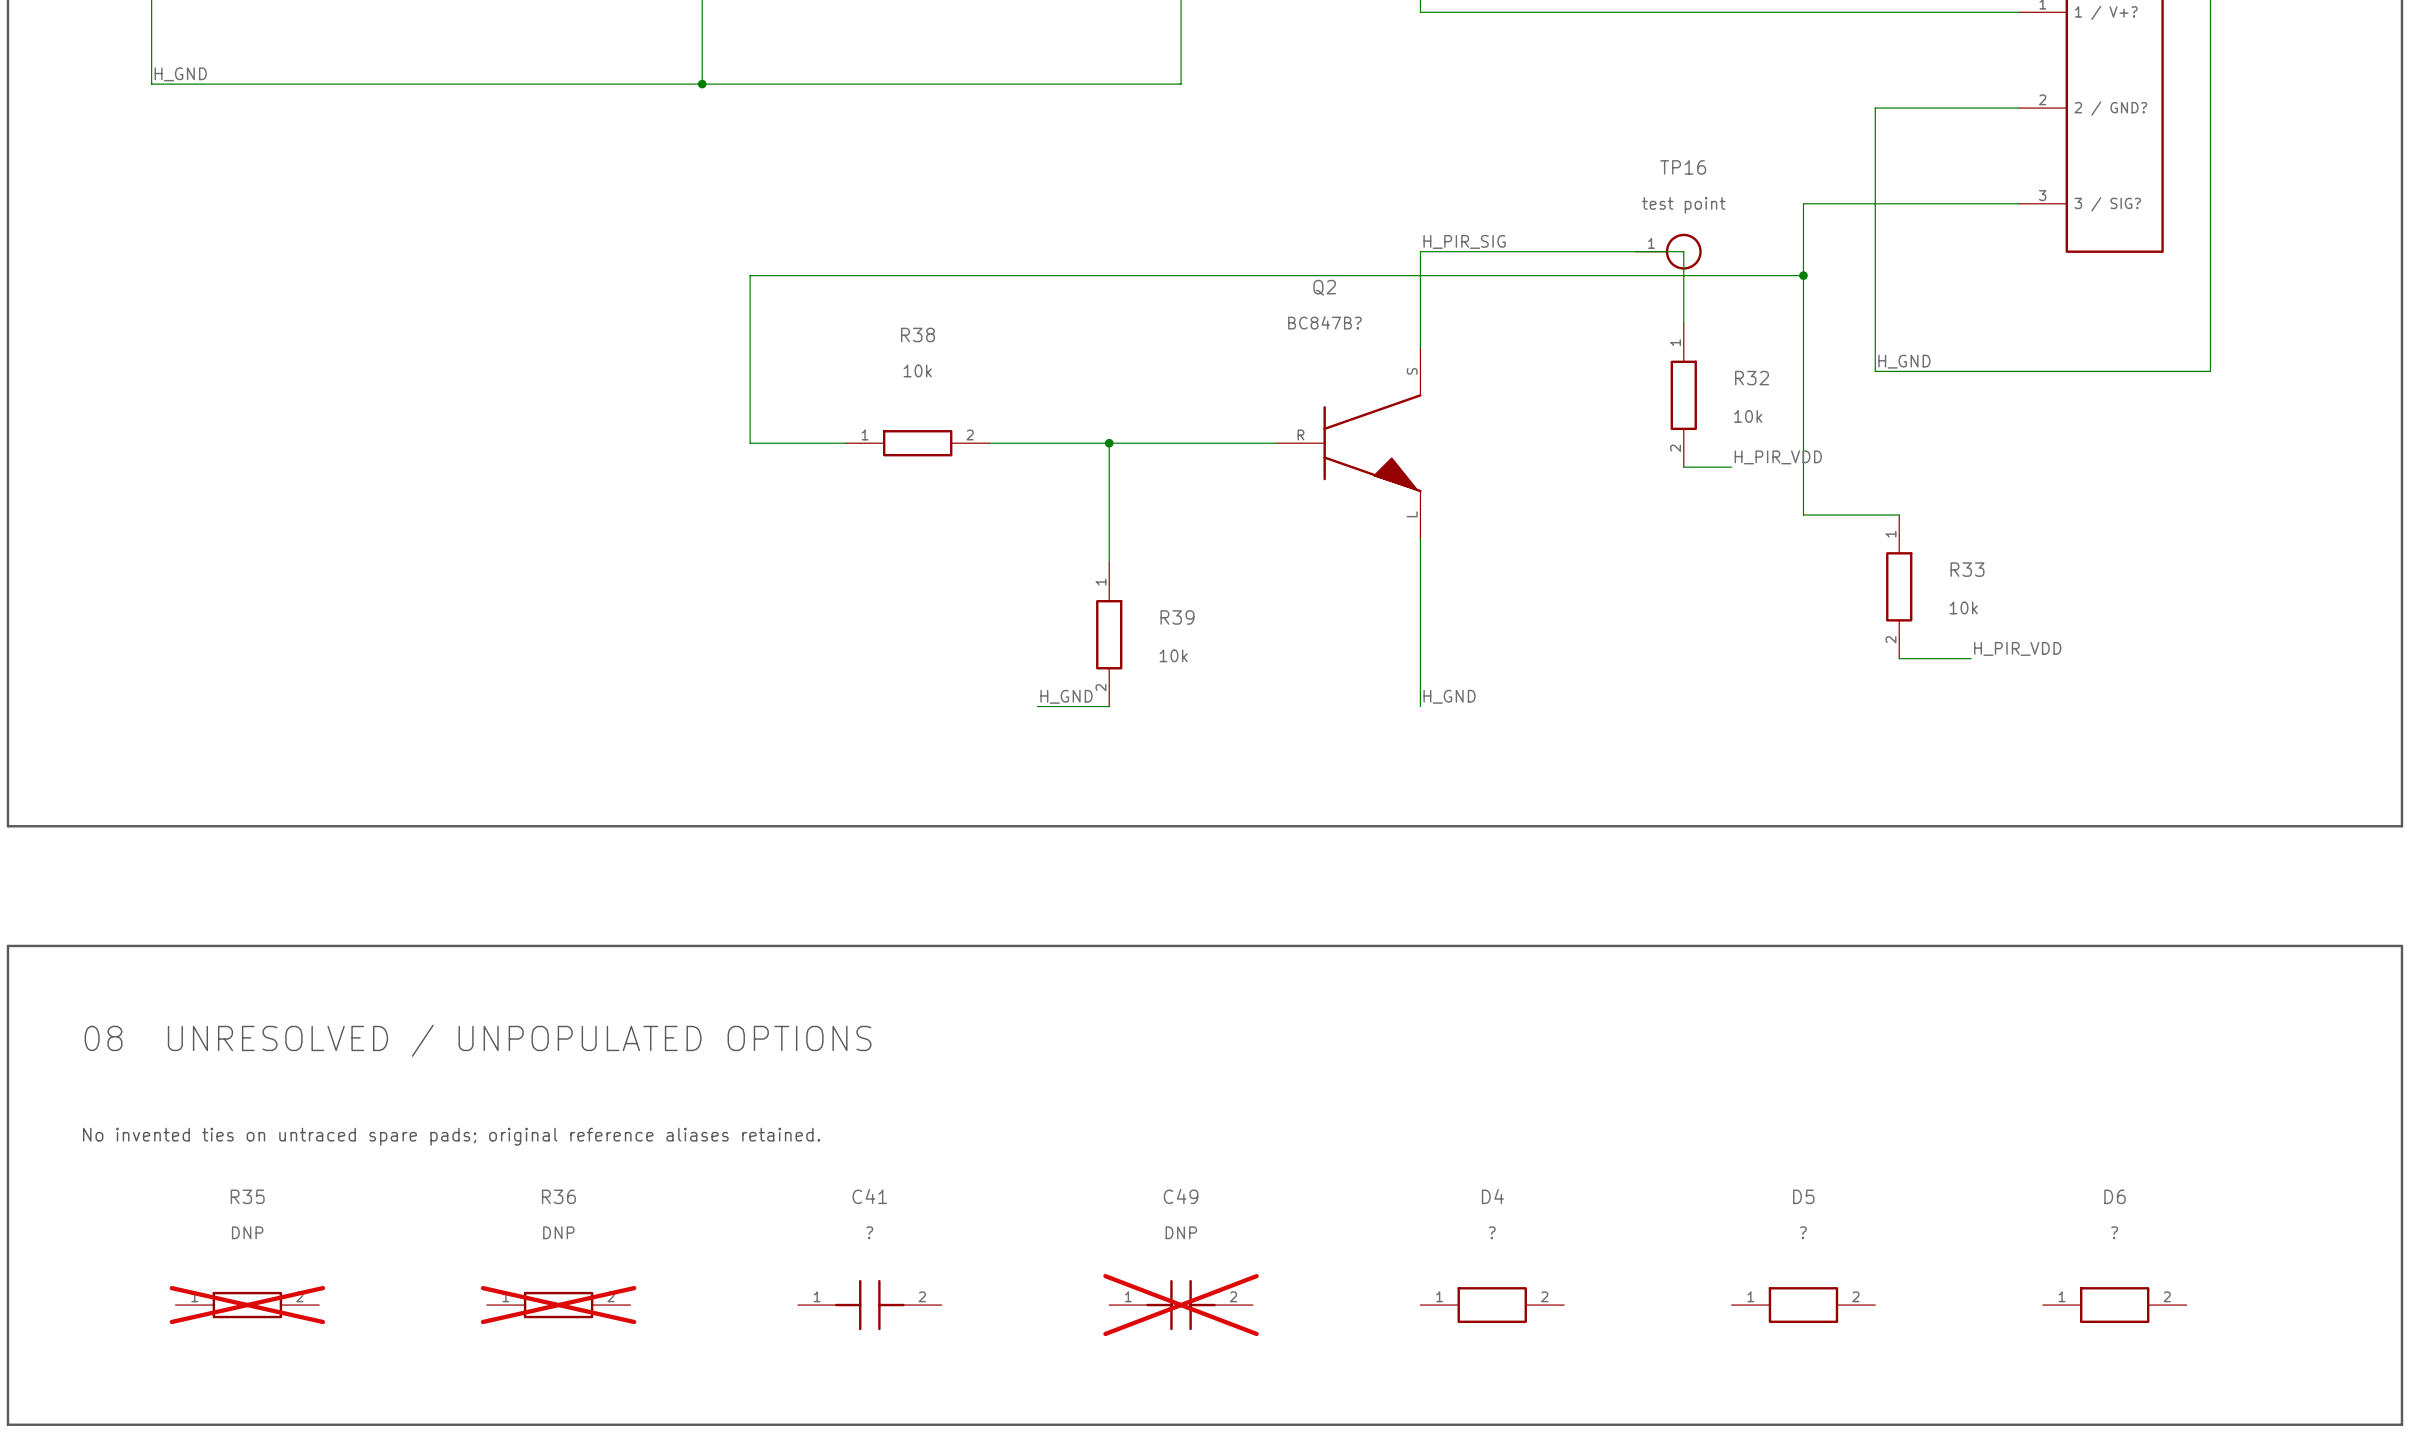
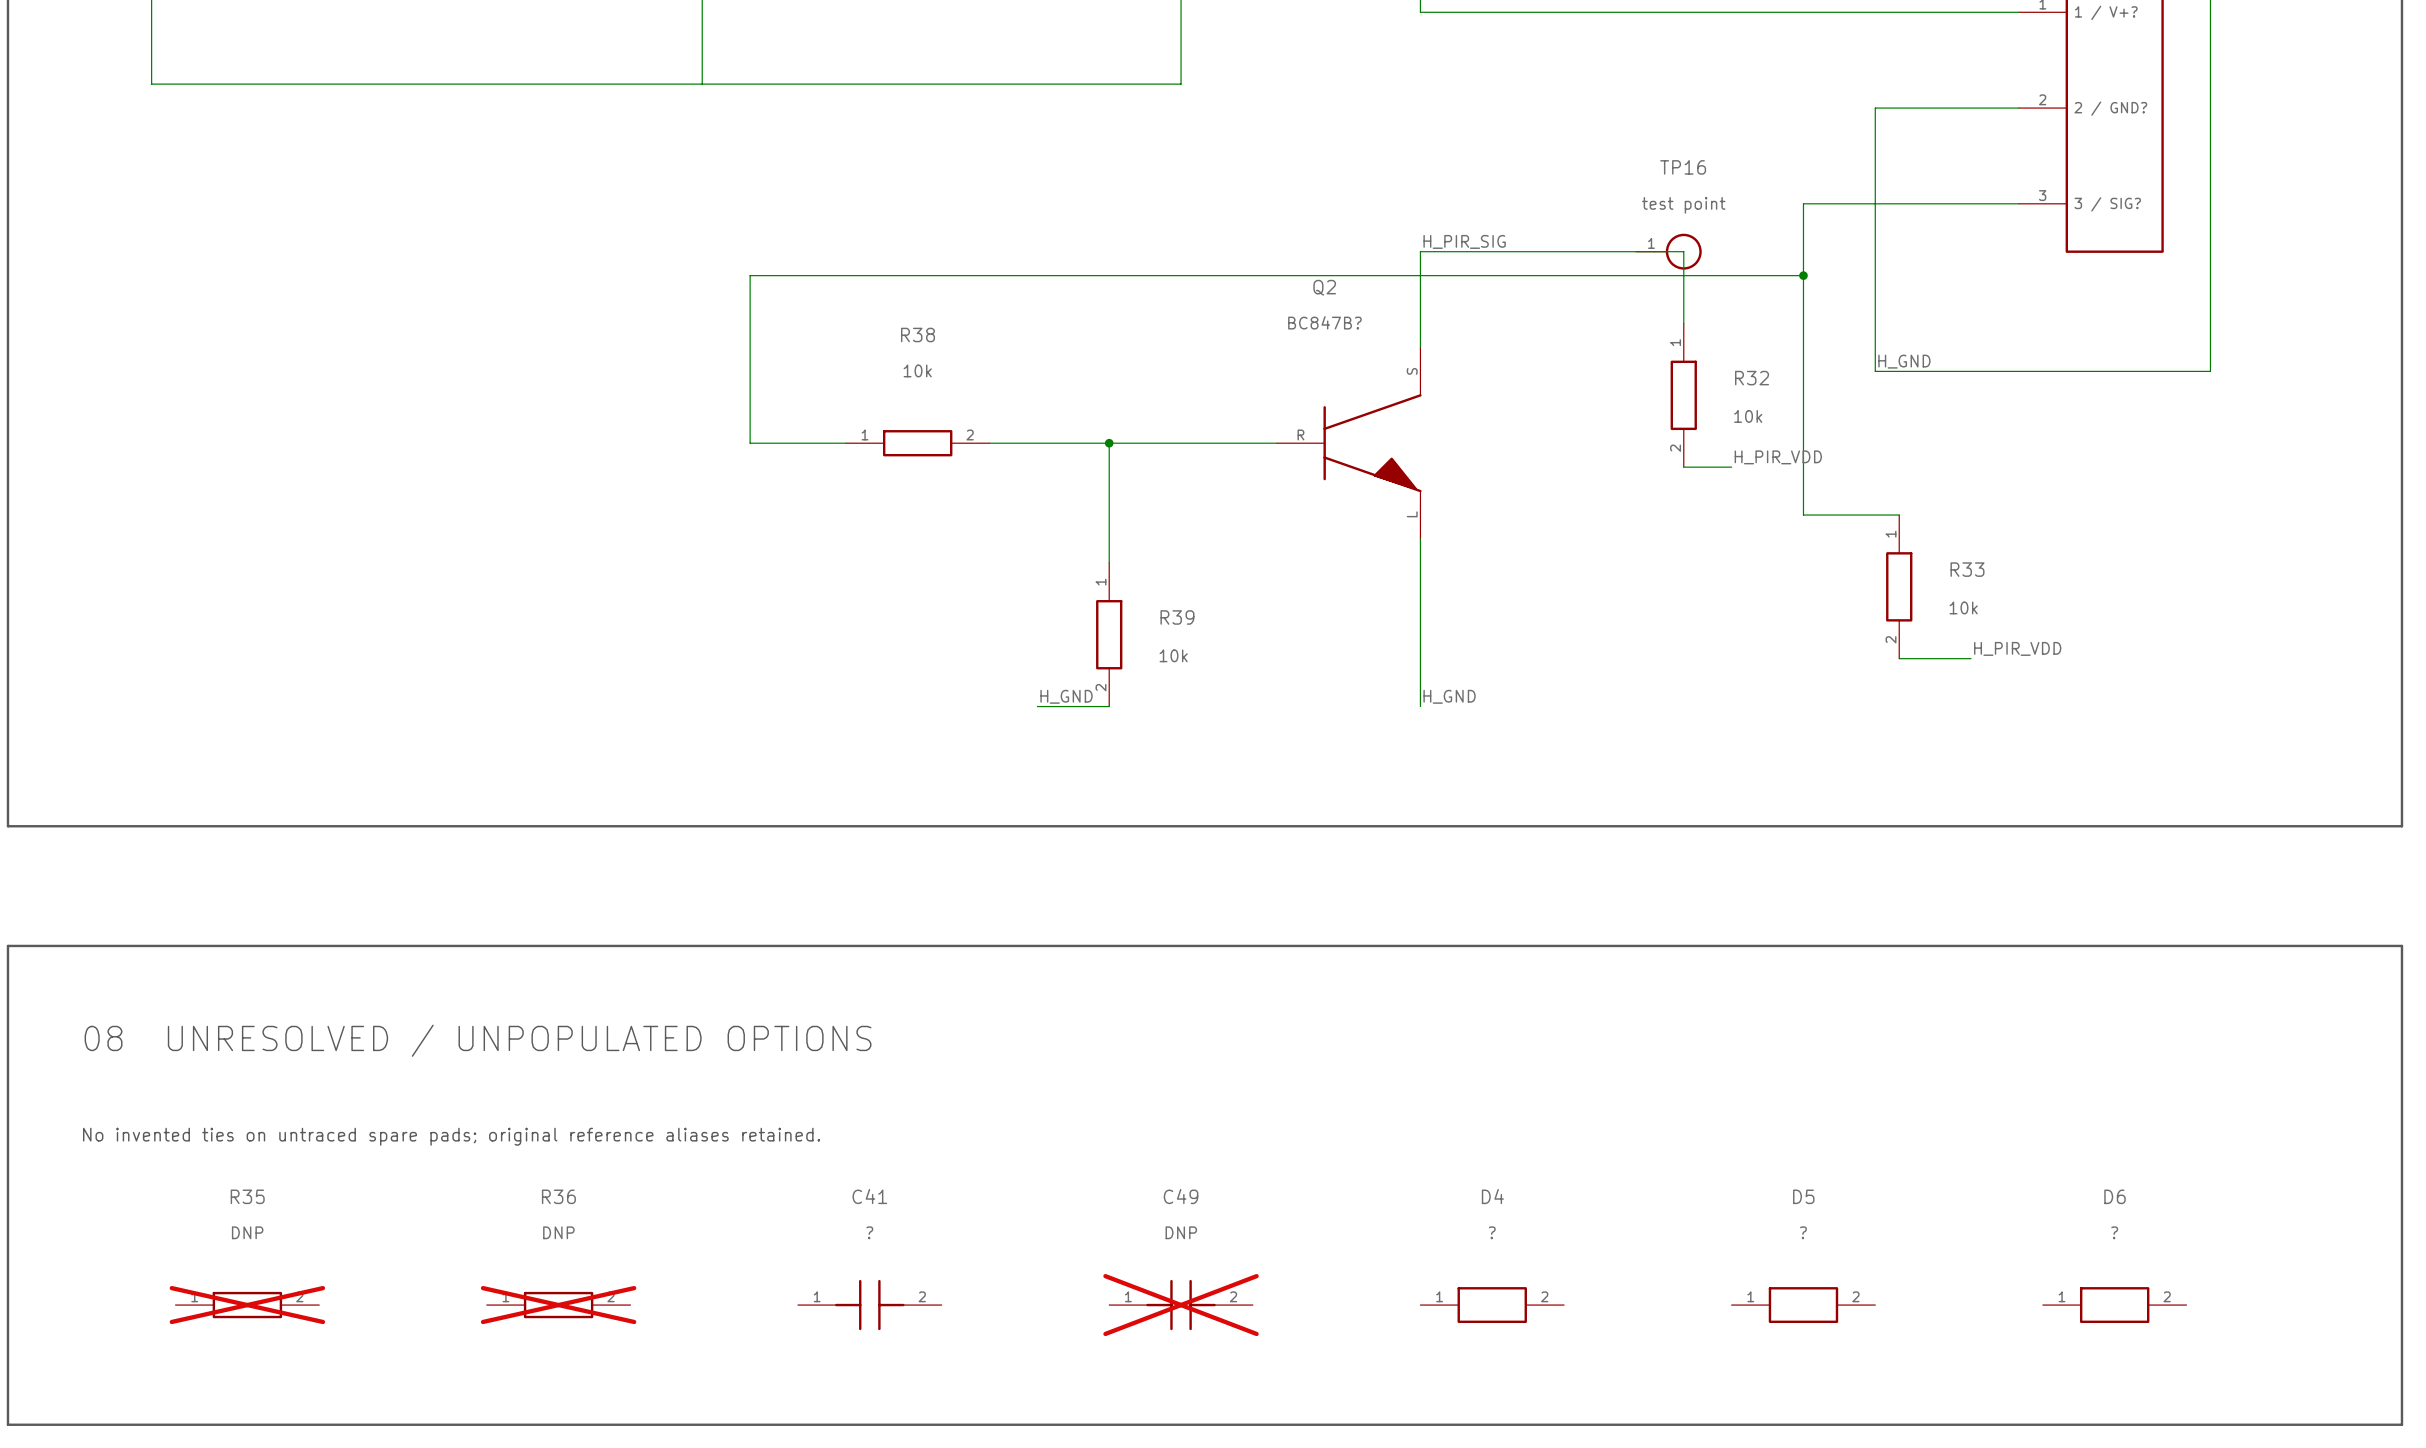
label: H_GND (180, 74) -> none
junction: (702, 84) -> none

